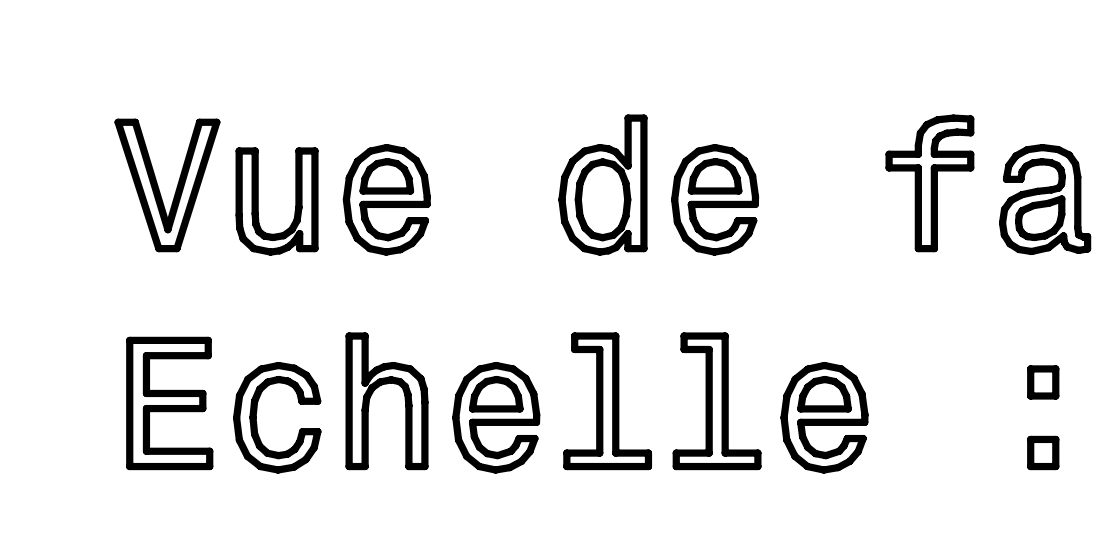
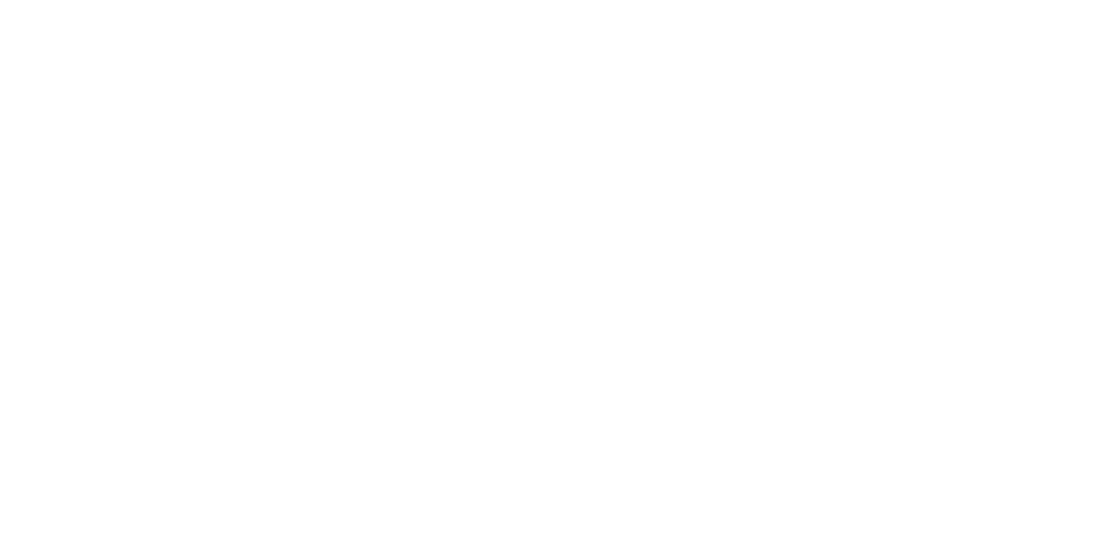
board edge: (628, 118) (628, 165) (615, 152) (599, 147) (584, 151) (572, 161) (564, 177) (561, 199) (564, 221) (572, 238) (584, 248) (599, 252) (608, 250) (616, 247) (627, 233) (627, 248) (643, 248) (643, 118) (628, 118) -> none
board edge: (953, 118) (937, 119) (926, 124) (920, 133) (918, 154) (889, 154) (889, 167) (918, 167) (918, 248) (934, 248) (934, 167) (970, 167) (970, 154) (934, 154) (935, 141) (939, 136) (957, 132) (970, 132) (970, 119) (953, 118) -> none
board edge: (118, 122) (135, 122) (167, 229) (199, 122) (216, 122) (177, 248) (158, 248) (118, 122) -> none
board edge: (239, 151) (255, 151) (255, 224) (258, 231) (264, 236) (272, 237) (283, 235) (291, 229) (297, 220) (298, 151) (314, 151) (314, 248) (299, 248) (299, 233) (287, 247) (270, 252) (253, 248) (243, 238) (239, 228) (239, 151) -> none
board edge: (387, 161) (396, 163) (404, 169) (408, 178) (410, 190) (363, 190) (365, 178) (370, 169) (377, 163) (387, 161) -> none
board edge: (602, 161) (592, 164) (585, 171) (579, 183) (578, 199) (579, 216) (585, 228) (592, 235) (602, 237) (613, 235) (621, 228) (625, 216) (627, 199) (625, 183) (621, 171) (613, 164) (602, 161) -> none
board edge: (715, 161) (725, 163) (732, 169) (737, 178) (738, 190) (691, 190) (693, 178) (698, 169) (705, 163) (715, 161) -> none
board edge: (1061, 198) (1059, 223) (1053, 231) (1045, 235) (1034, 237) (1022, 233) (1018, 221) (1022, 210) (1033, 205) (1061, 198) -> none
board edge: (363, 204) (427, 204) (424, 176) (416, 160) (403, 151) (386, 147) (370, 151) (357, 161) (349, 177) (346, 199) (349, 222) (357, 238) (369, 248) (386, 252) (400, 249) (412, 243) (420, 233) (425, 220) (409, 220) (401, 233) (388, 237) (377, 235) (370, 229) (364, 218) (363, 204) -> none
board edge: (691, 204) (755, 204) (752, 176) (744, 160) (731, 151) (714, 147) (698, 151) (685, 161) (677, 177) (674, 199) (677, 222) (685, 238) (698, 248) (714, 252) (728, 249) (740, 243) (748, 233) (753, 220) (737, 220) (729, 233) (716, 237) (706, 235) (698, 229) (693, 218) (691, 204) -> none
board edge: (1063, 235) (1048, 247) (1031, 251) (1019, 249) (1009, 243) (1004, 234) (1002, 222) (1004, 209) (1011, 200) (1022, 194) (1058, 188) (1061, 184) (1061, 170) (1057, 165) (1041, 161) (1026, 166) (1022, 171) (1020, 179) (1006, 179) (1008, 165) (1015, 155) (1027, 149) (1042, 147) (1058, 149) (1069, 155) (1075, 164) (1077, 177) (1078, 234) (1087, 236) (1087, 248) (1078, 250) (1067, 246) (1063, 236) -> none
board edge: (349, 336) (365, 336) (365, 383) (376, 370) (393, 365) (410, 368) (420, 378) (424, 402) (424, 466) (408, 466) (408, 394) (405, 386) (399, 381) (391, 379) (380, 382) (372, 387) (366, 397) (365, 466) (349, 466) (349, 336) -> none
board edge: (574, 336) (615, 336) (615, 453) (648, 453) (648, 466) (566, 466) (566, 453) (599, 453) (599, 349) (574, 349) (574, 336) -> none
board edge: (684, 336) (684, 349) (709, 349) (709, 453) (676, 453) (676, 466) (757, 466) (757, 453) (725, 453) (725, 336) (684, 336) -> none
board edge: (129, 340) (129, 466) (209, 466) (209, 451) (146, 451) (146, 408) (202, 408) (202, 393) (146, 393) (146, 355) (208, 355) (208, 340) (129, 340) -> none
board edge: (278, 365) (261, 369) (247, 379) (239, 395) (236, 418) (239, 440) (247, 456) (260, 466) (278, 469) (293, 467) (305, 459) (314, 447) (317, 431) (302, 431) (299, 441) (294, 449) (287, 454) (278, 455) (267, 453) (259, 445) (254, 434) (252, 417) (254, 401) (259, 389) (267, 382) (278, 379) (288, 381) (295, 385) (299, 392) (301, 401) (317, 401) (314, 386) (306, 375) (294, 368) (278, 365) -> none
board edge: (1030, 368) (1030, 396) (1055, 396) (1055, 368) (1030, 368) -> none
board edge: (496, 379) (506, 381) (513, 387) (518, 396) (519, 408) (472, 408) (474, 396) (479, 387) (486, 381) (496, 379) -> none
board edge: (824, 379) (834, 381) (842, 387) (846, 396) (848, 408) (800, 408) (802, 396) (807, 387) (815, 381) (824, 379) -> none
board edge: (472, 422) (536, 422) (533, 394) (525, 378) (513, 368) (496, 365) (479, 369) (466, 379) (458, 395) (455, 417) (458, 440) (466, 456) (479, 466) (495, 469) (509, 467) (521, 461) (529, 451) (534, 438) (519, 438) (511, 451) (497, 455) (487, 453) (479, 447) (474, 436) (472, 422) -> none
board edge: (800, 422) (864, 422) (862, 394) (854, 378) (841, 368) (824, 365) (807, 369) (795, 379) (786, 395) (784, 417) (786, 440) (794, 456) (807, 466) (823, 469) (838, 467) (849, 461) (858, 451) (863, 438) (847, 438) (839, 451) (825, 455) (815, 453) (807, 447) (802, 436) (800, 422) -> none
board edge: (1030, 439) (1030, 466) (1055, 466) (1055, 439) (1030, 439) -> none

